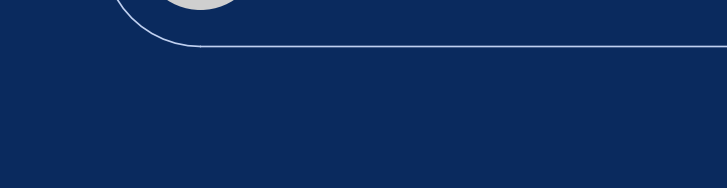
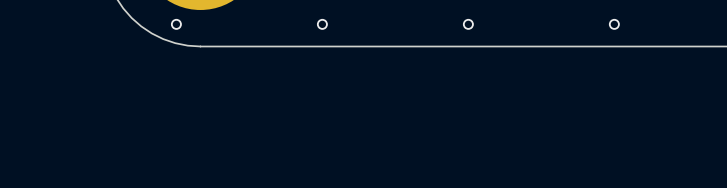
via: none -> (176, 24)
via: none -> (322, 24)
via: none -> (468, 24)
via: none -> (614, 24)

